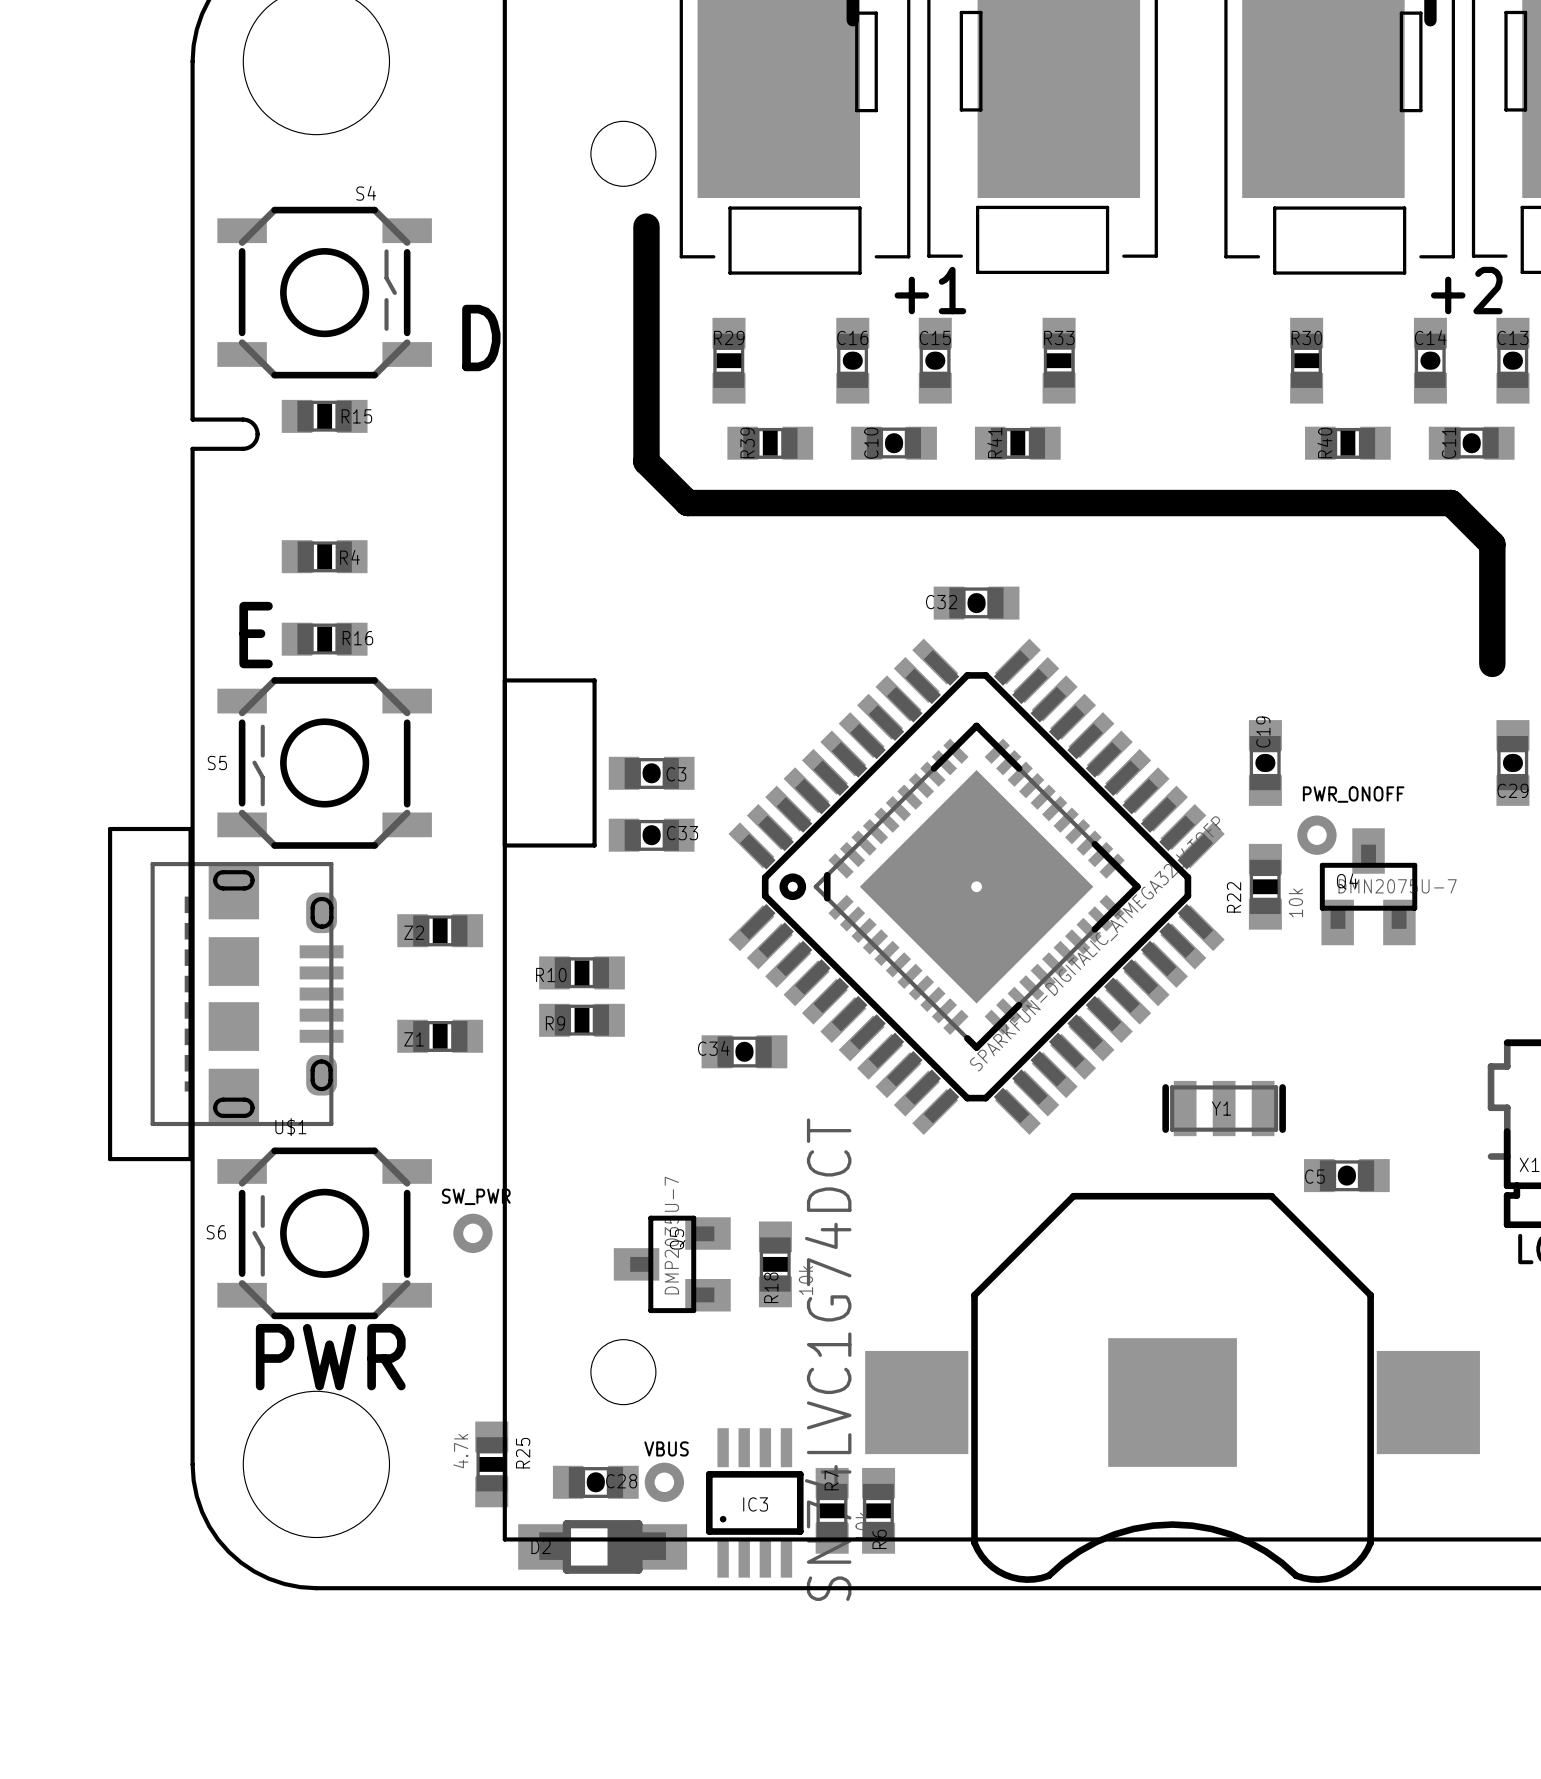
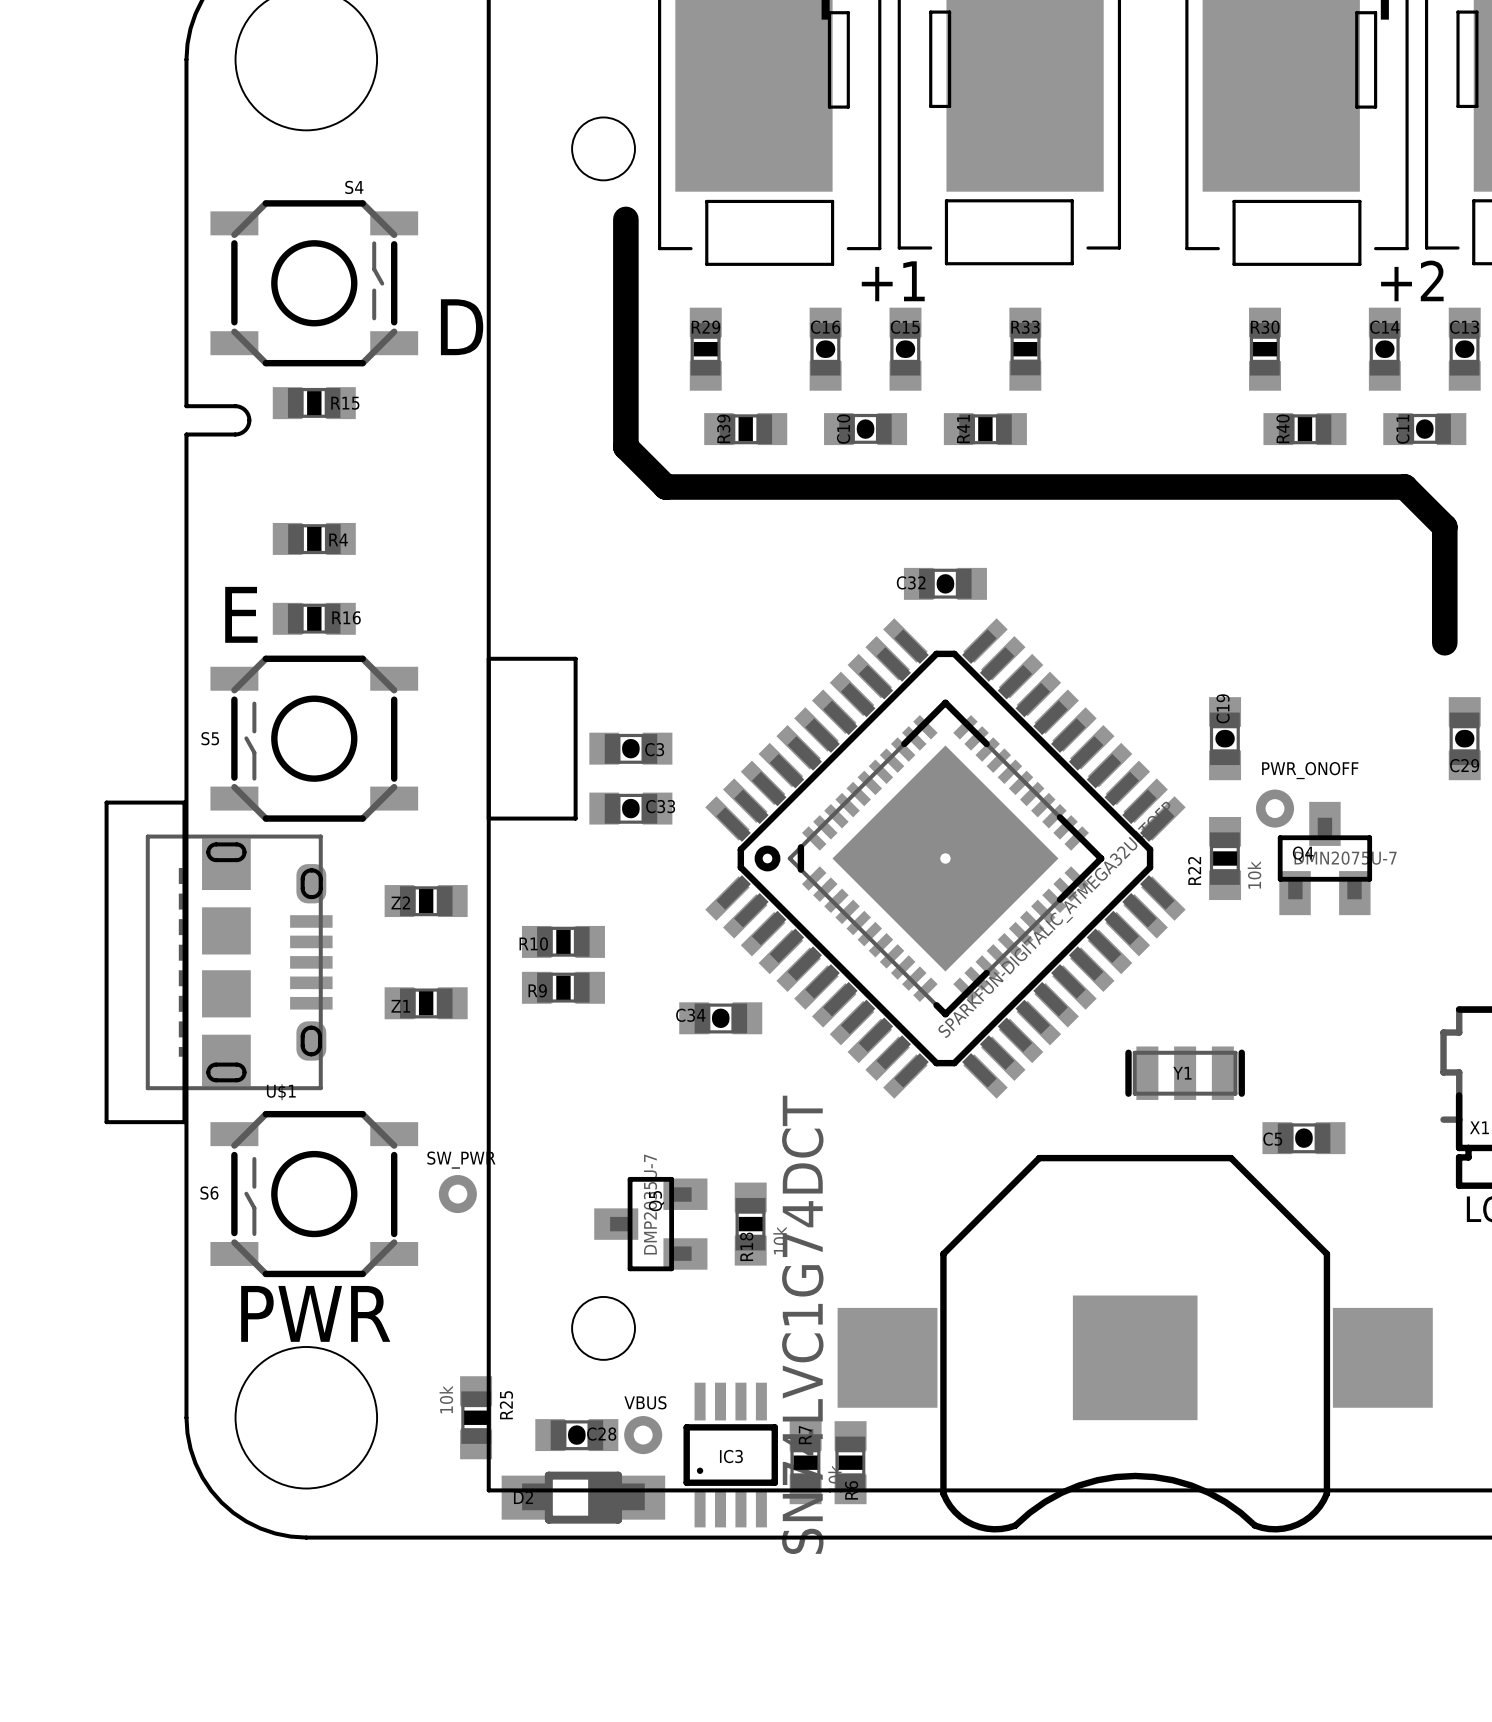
R25 value: 4.7k (460, 1451) -> 10k (446, 1399)

